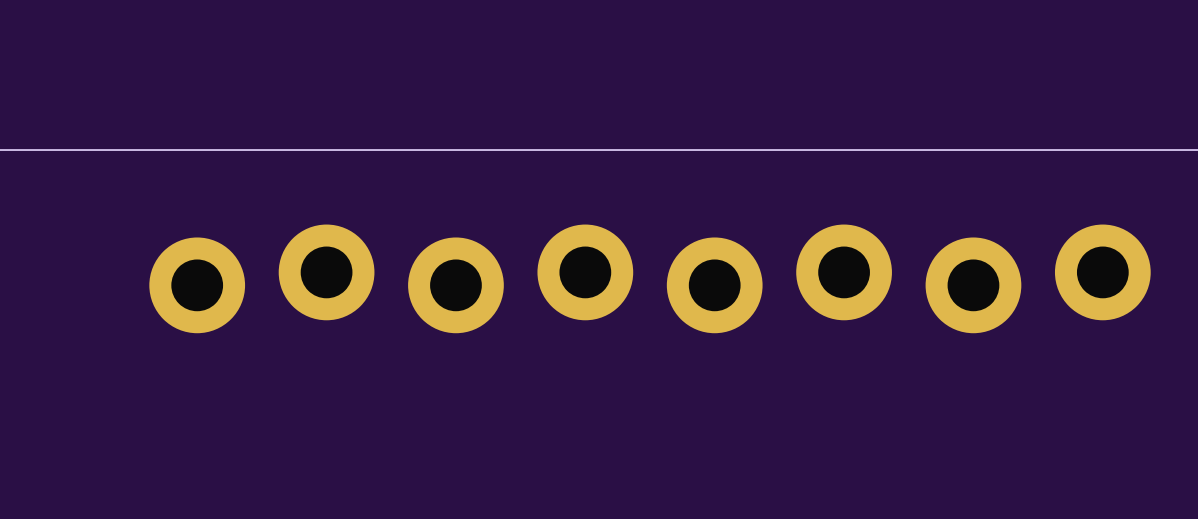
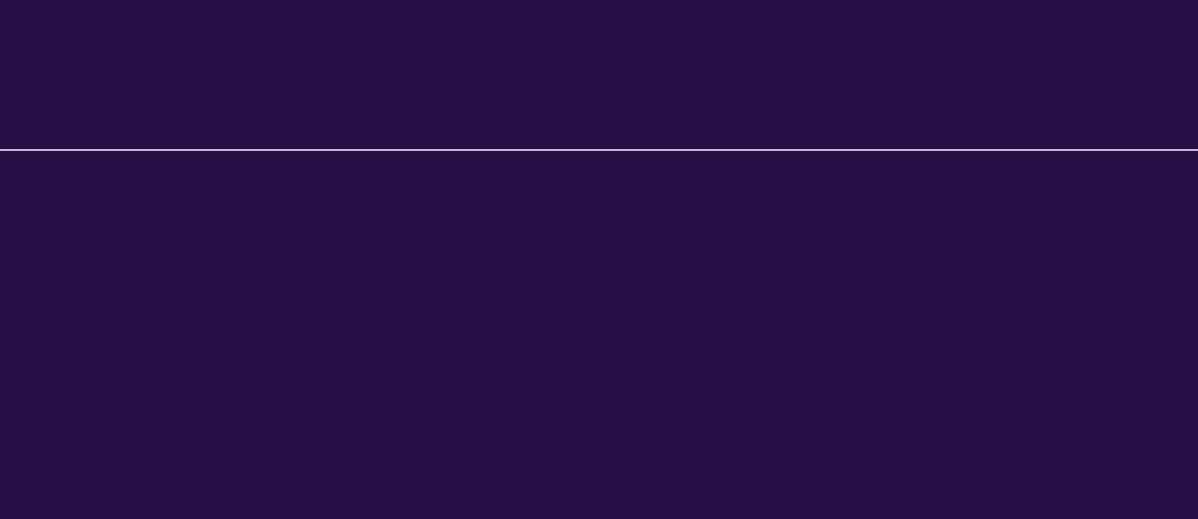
part: (650, 278) -> none

